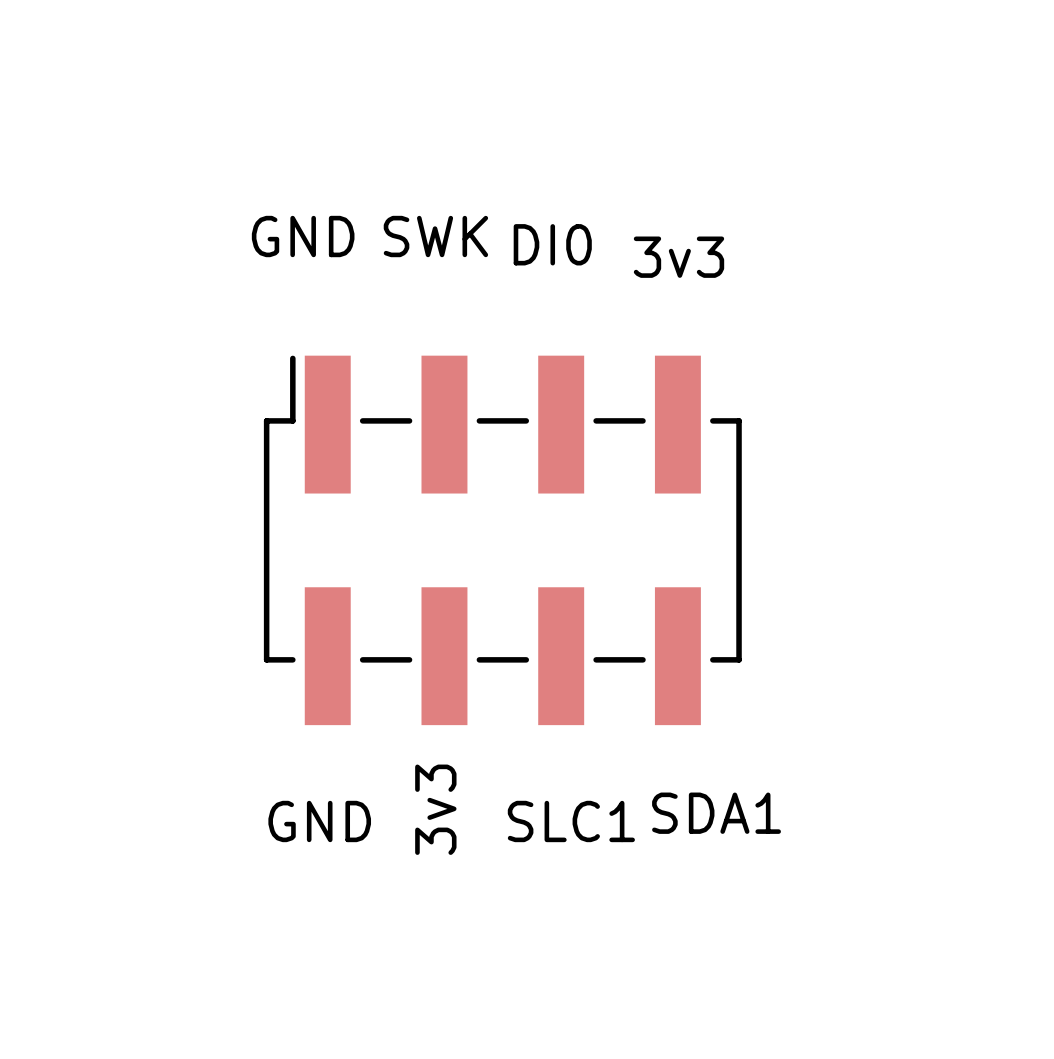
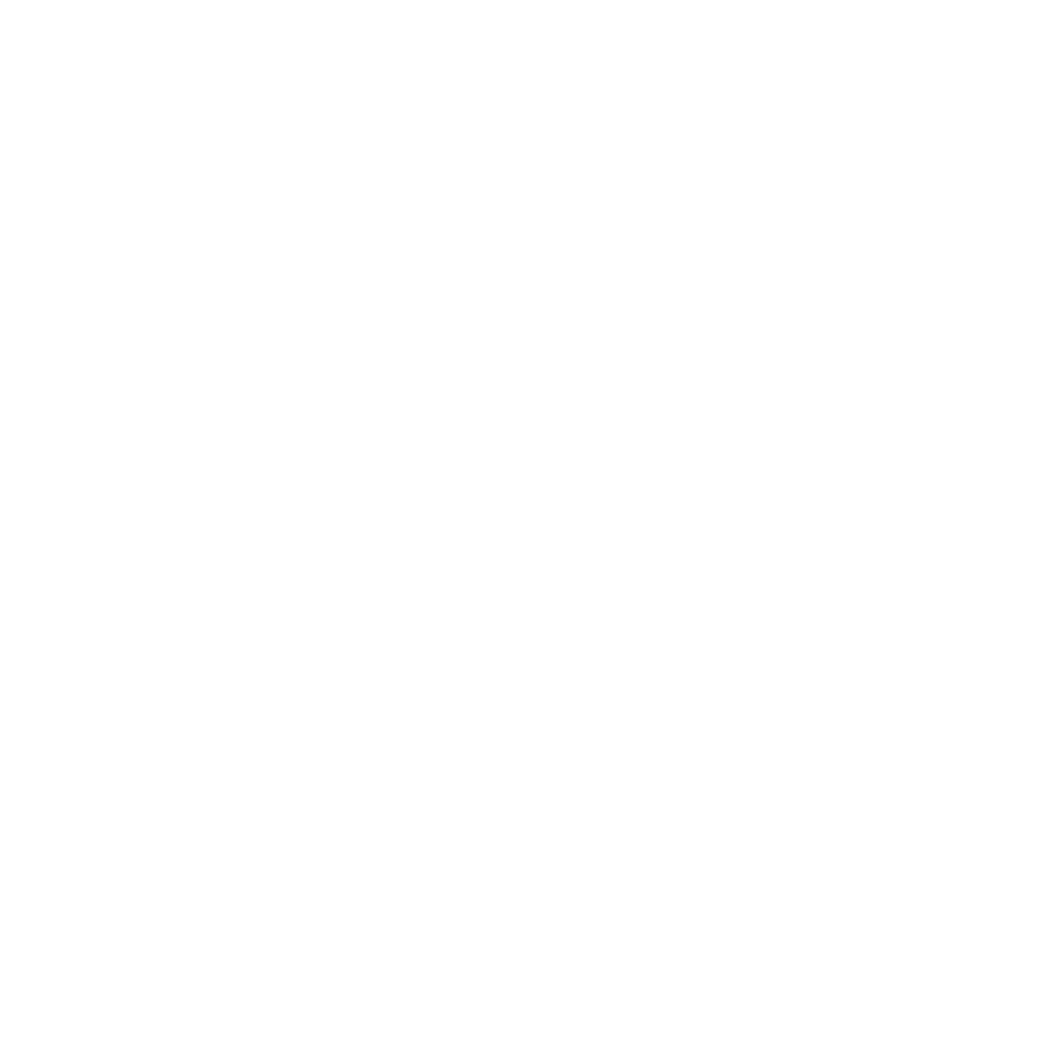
text: GND (303, 236) -> none
text: SWK (435, 236) -> none
text: DI0 (552, 244) -> none
text: 3v3 (678, 257) -> none
part: (502, 540) -> none
text: 3v3 (435, 809) -> none
text: SDA1 (716, 813) -> none
text: GND (319, 821) -> none
text: SLC1 (571, 821) -> none

